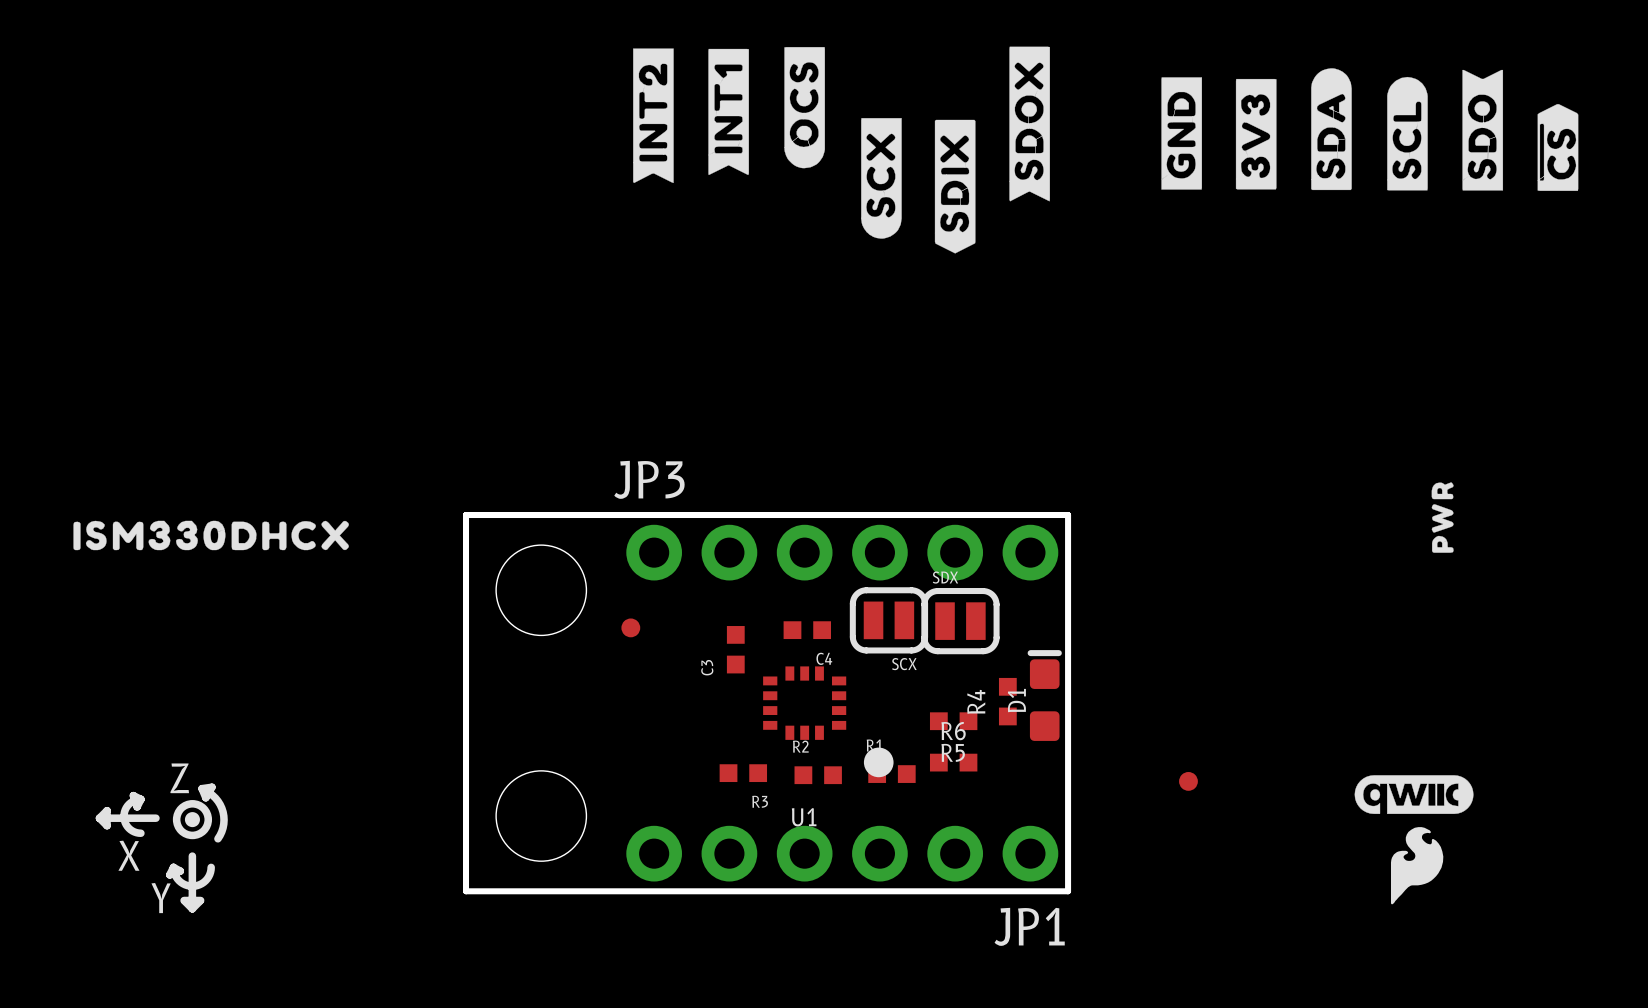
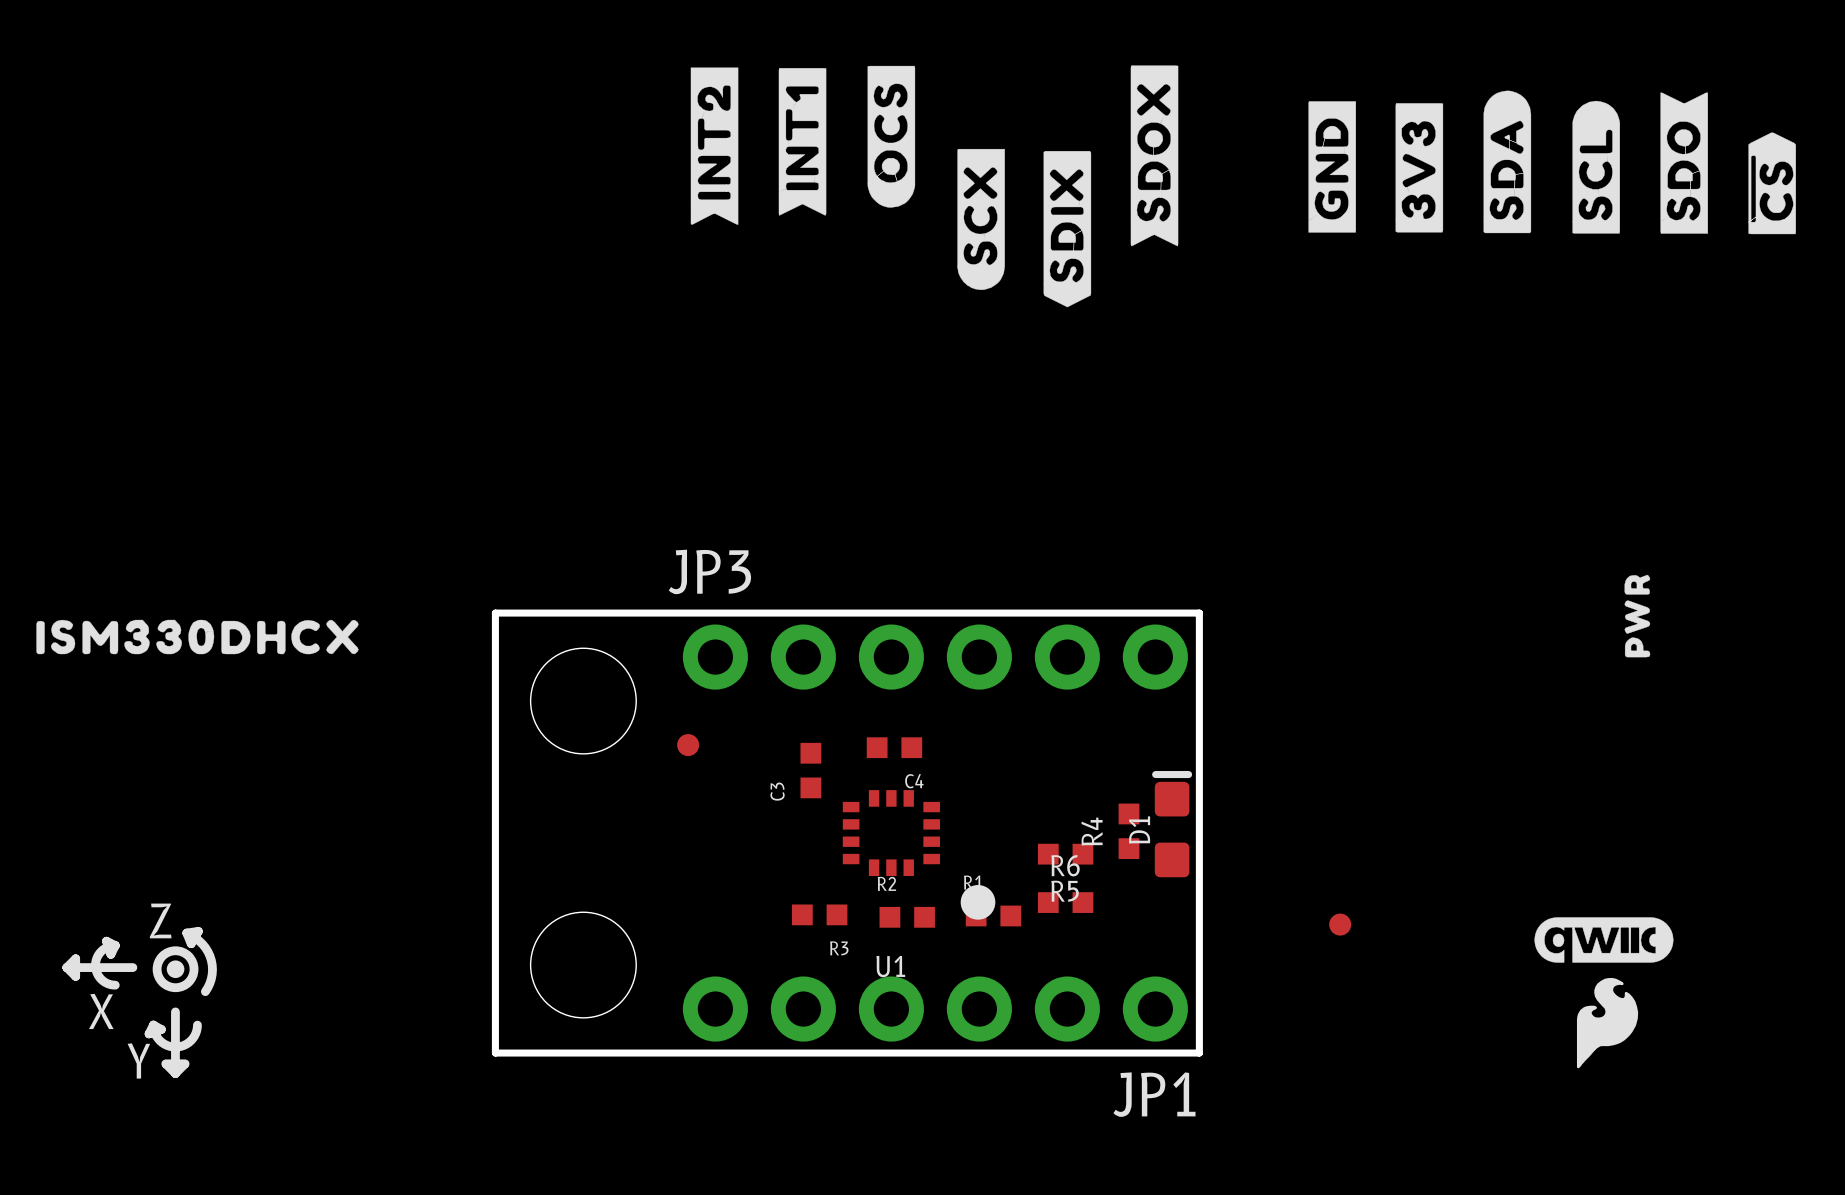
SCX: (888, 620) -> none
SDX: (960, 621) -> none

